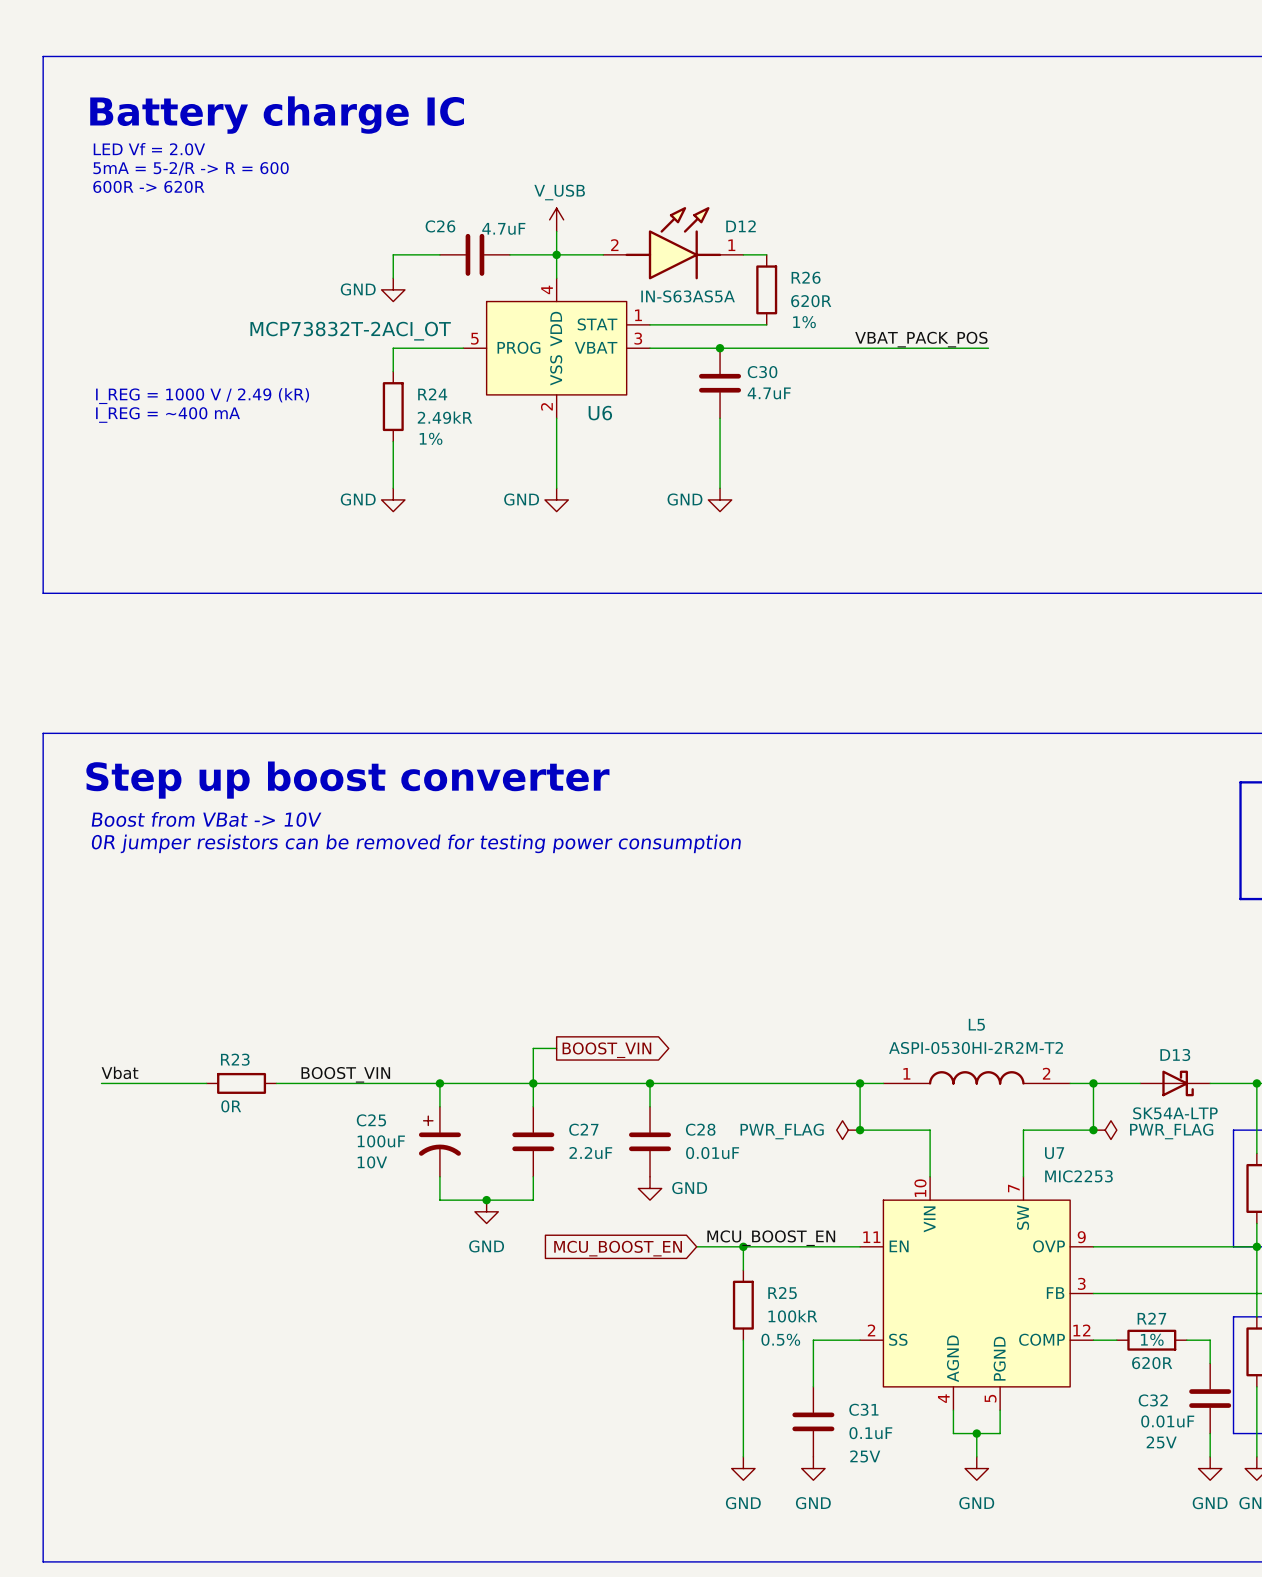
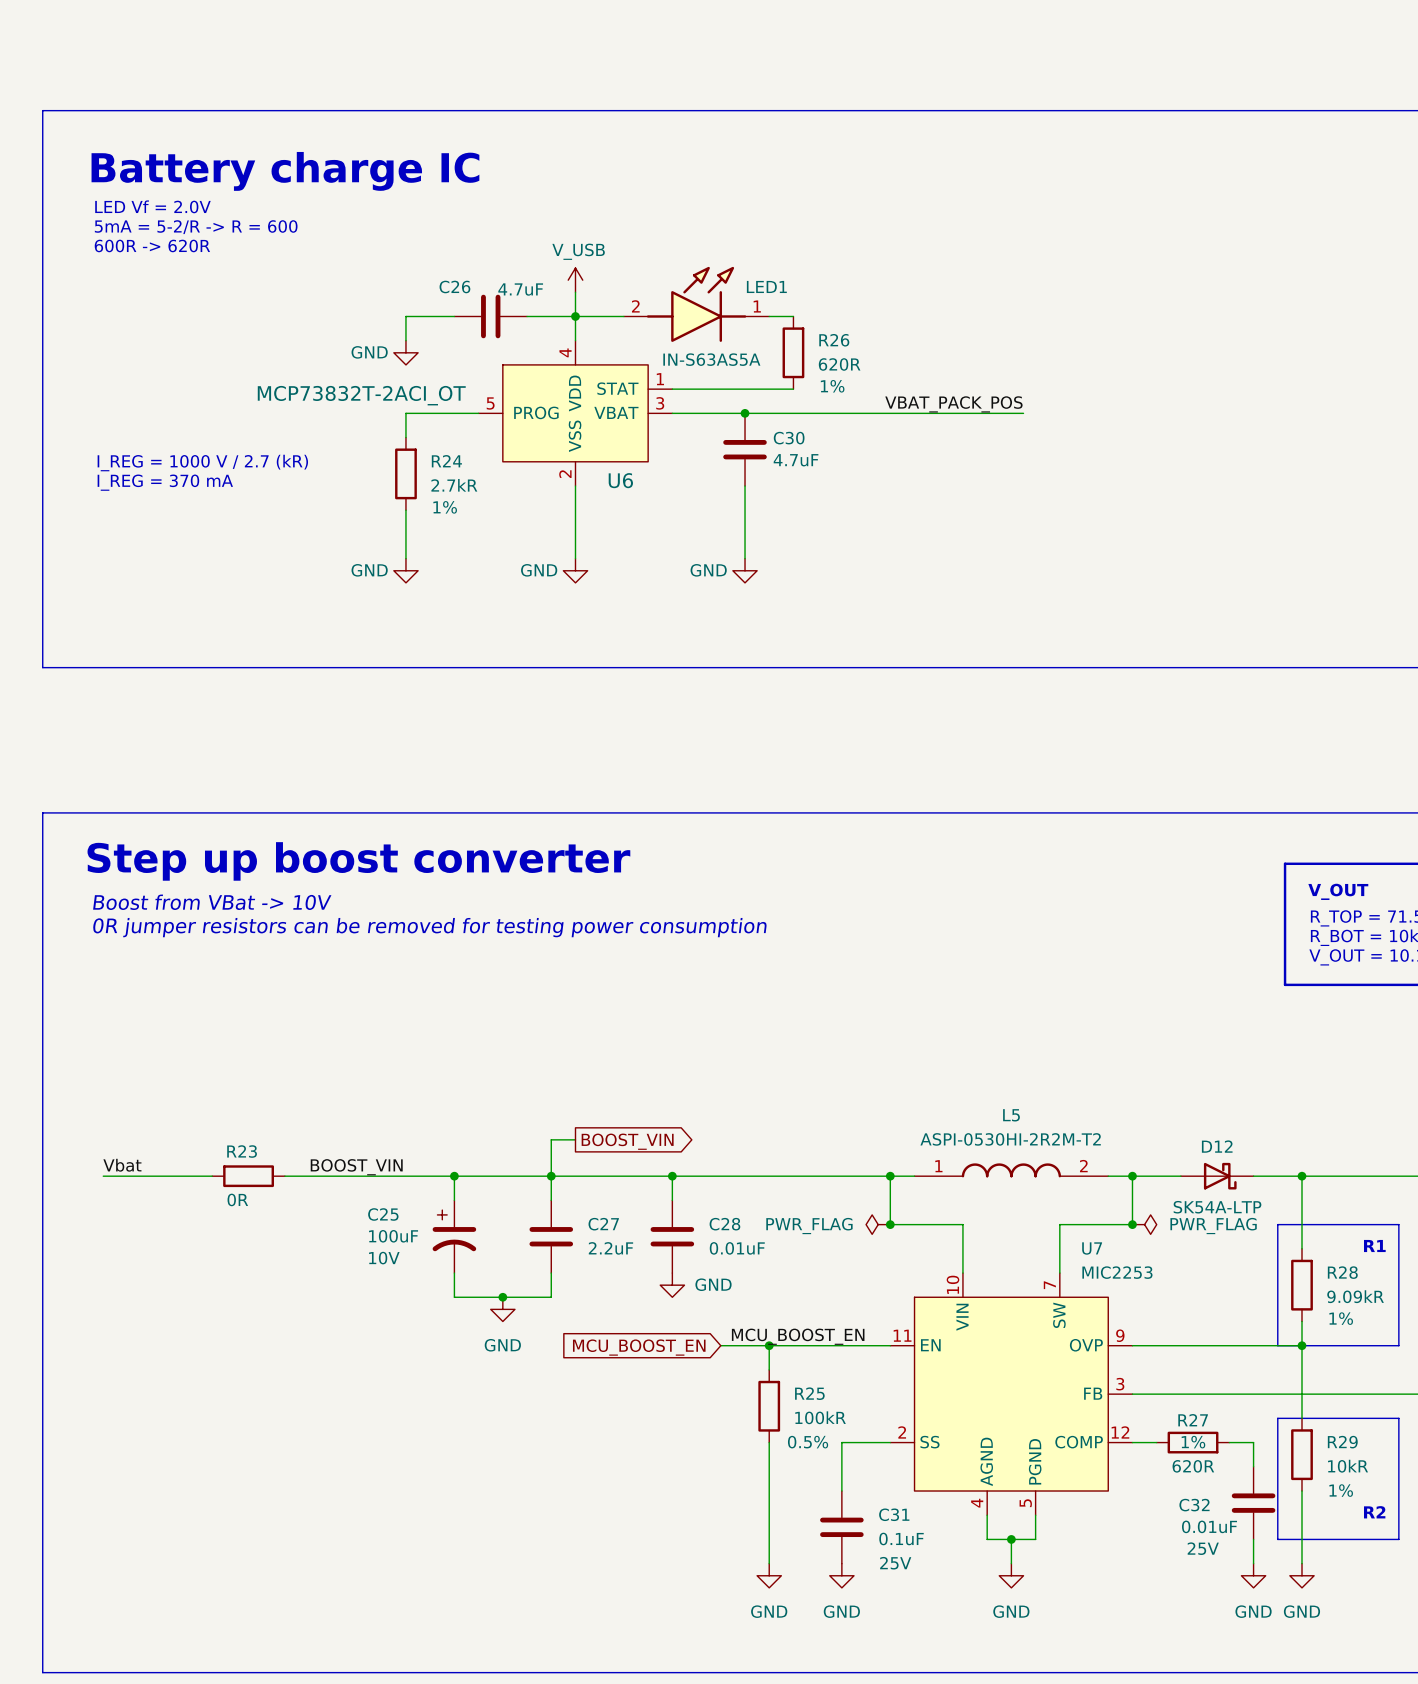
D12 name: D12 (741, 226) -> LED1 (766, 286)
text: I_REG = 1000 V / 2.49 (kR) (202, 396) -> I_REG = 1000 V / 2.7 (kR) (202, 463)
text: I_REG = ~400 mA (168, 415) -> I_REG = 370 mA (165, 482)
R24 value: 2.49kR (444, 417) -> 2.7kR (454, 485)
D13 name: D13 (1175, 1055) -> D12 (1217, 1146)

